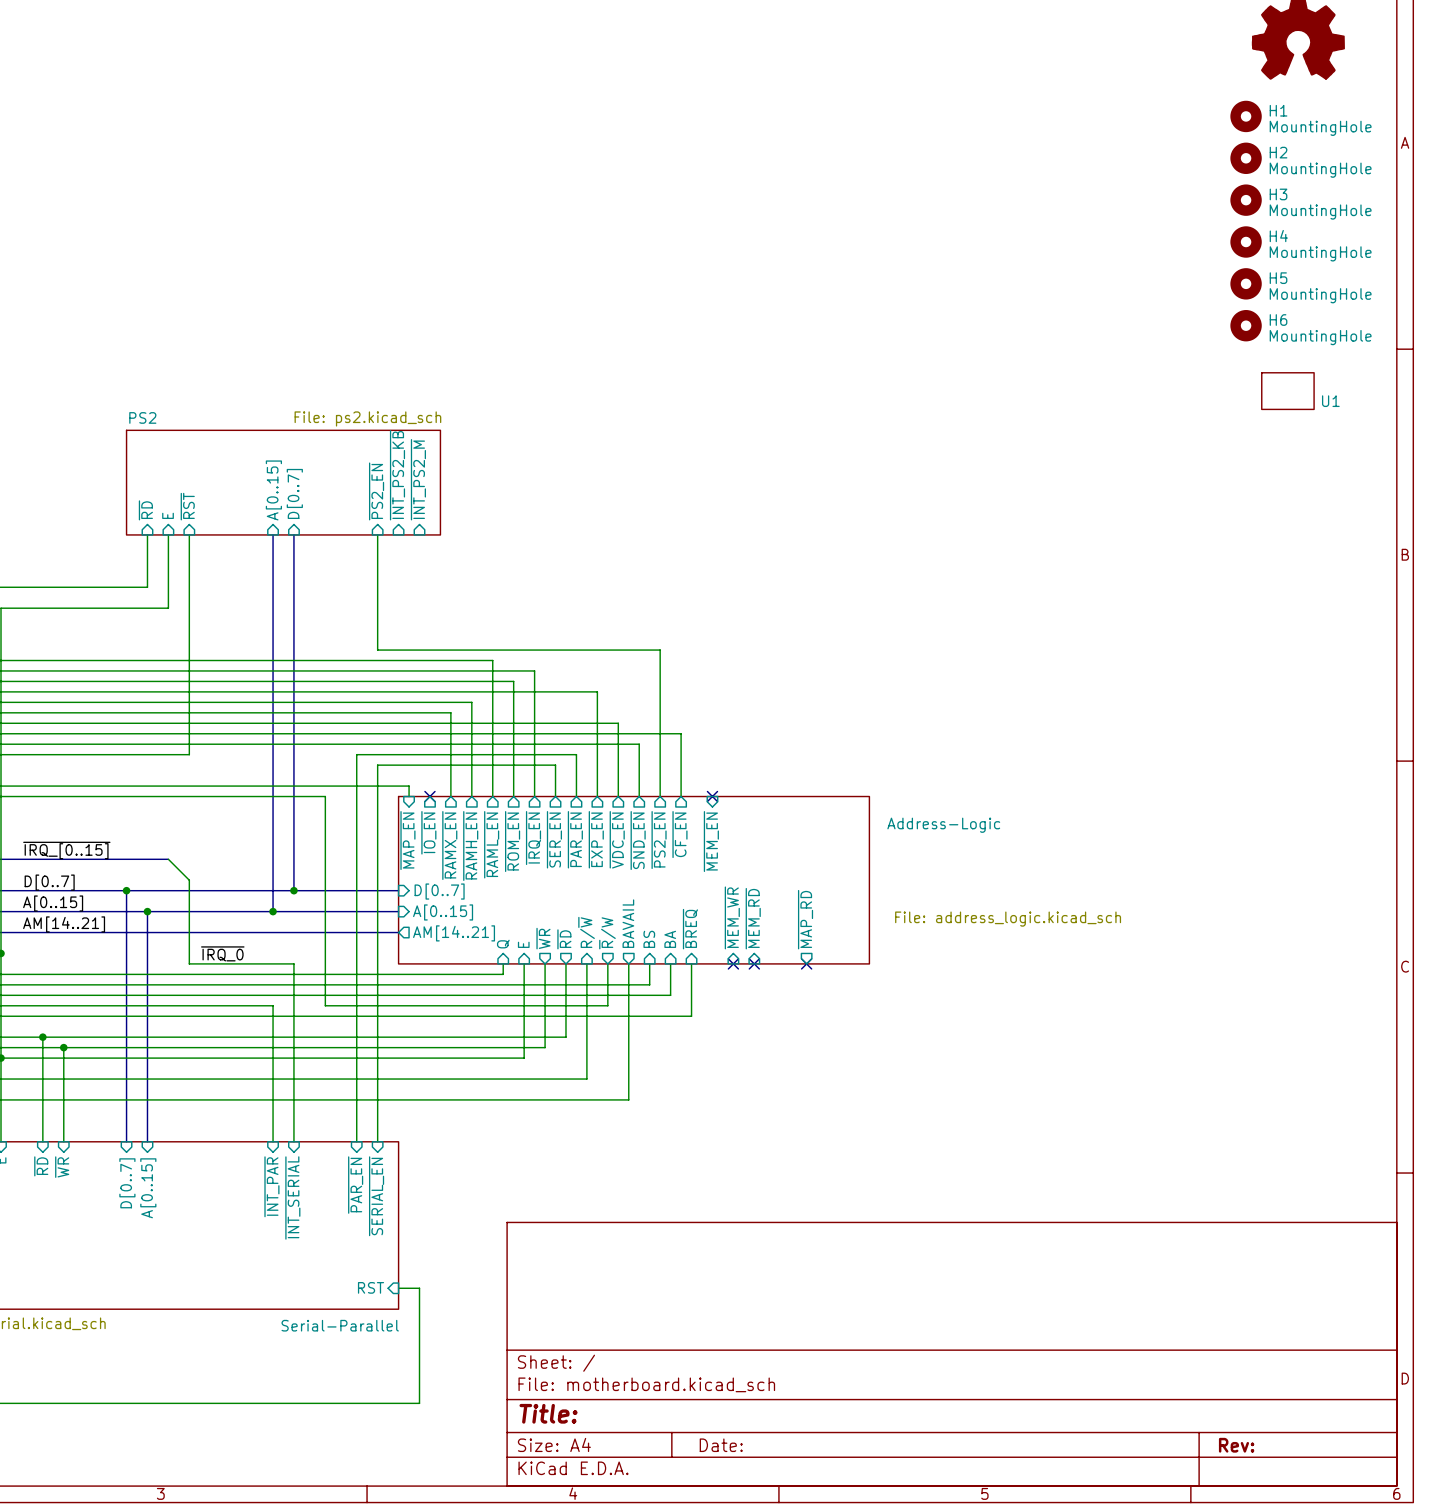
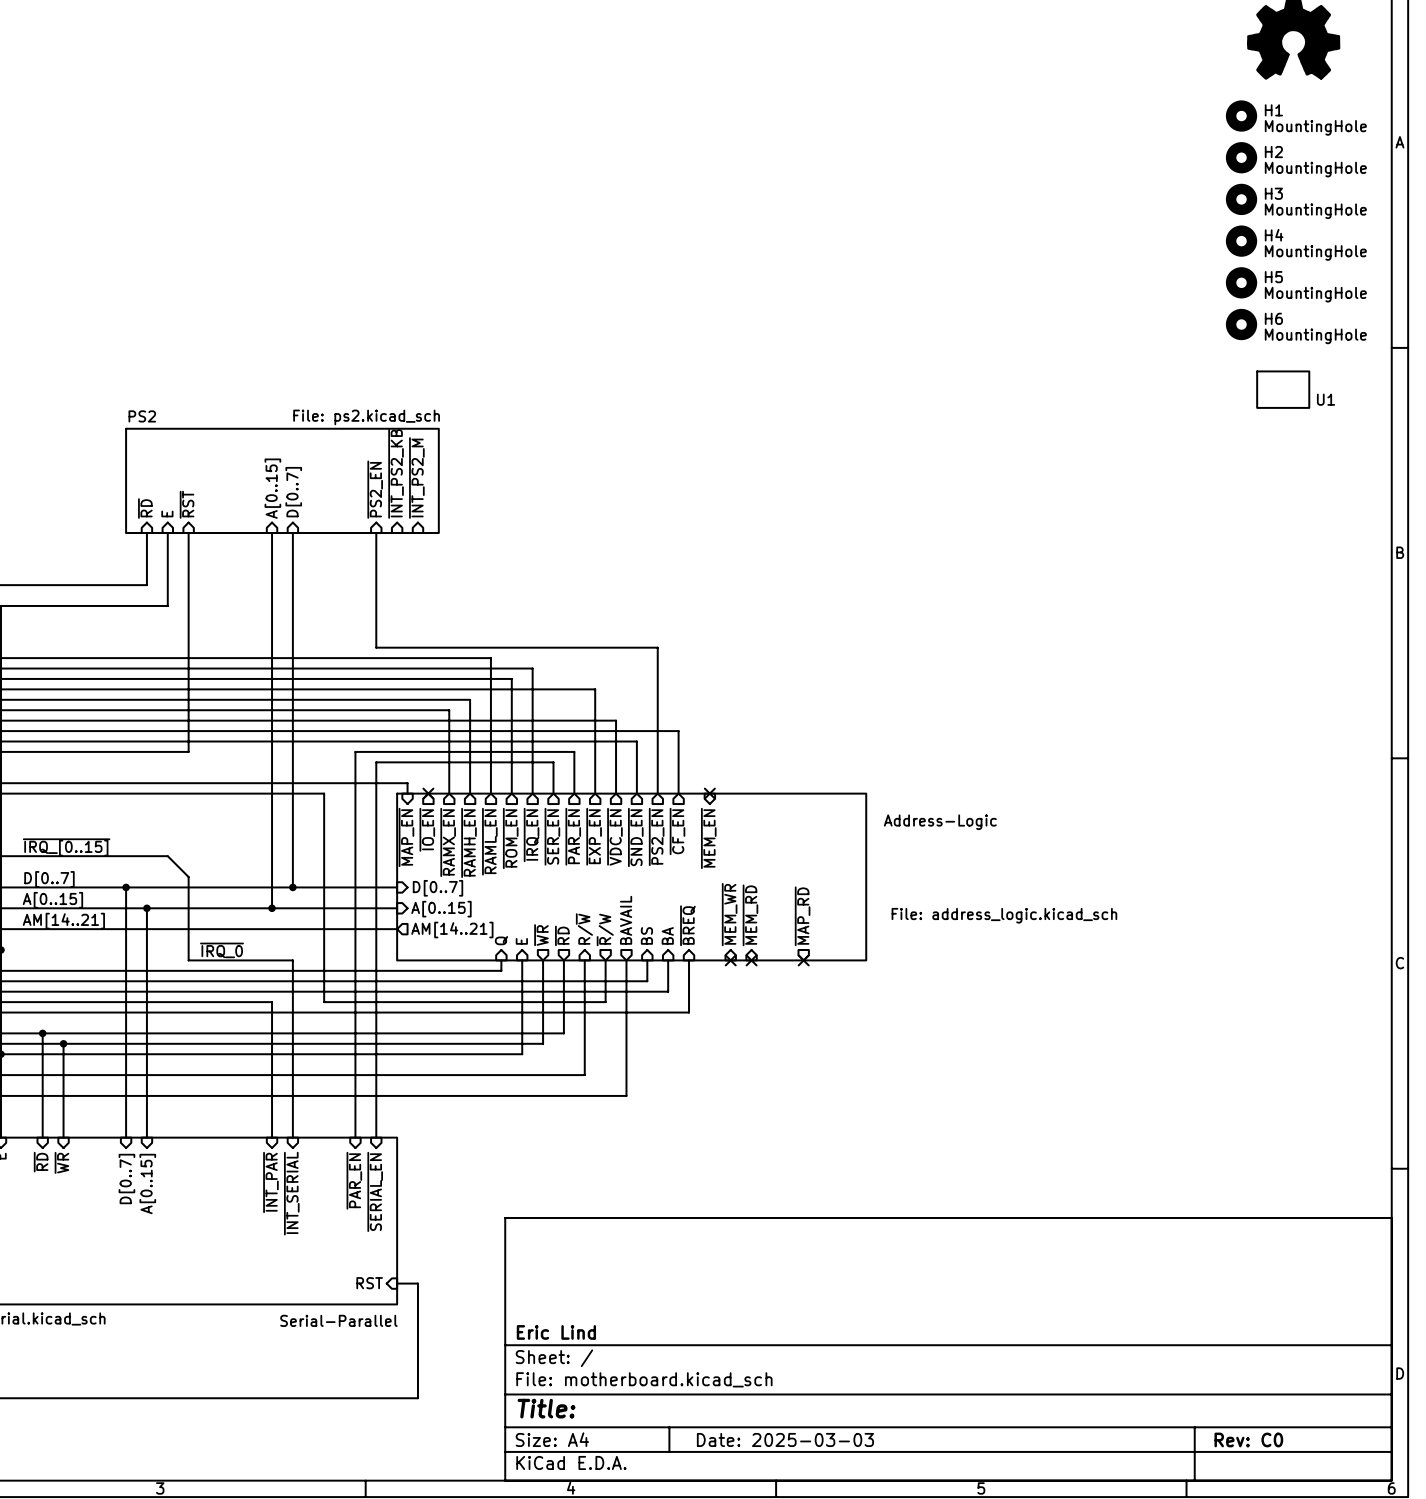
title block: none -> Eric Lind (556, 1332)
title block: Date: (721, 1445) -> Date: 2025-03-03 (785, 1439)
title block: Rev: (1236, 1445) -> Rev: C0 (1248, 1439)

